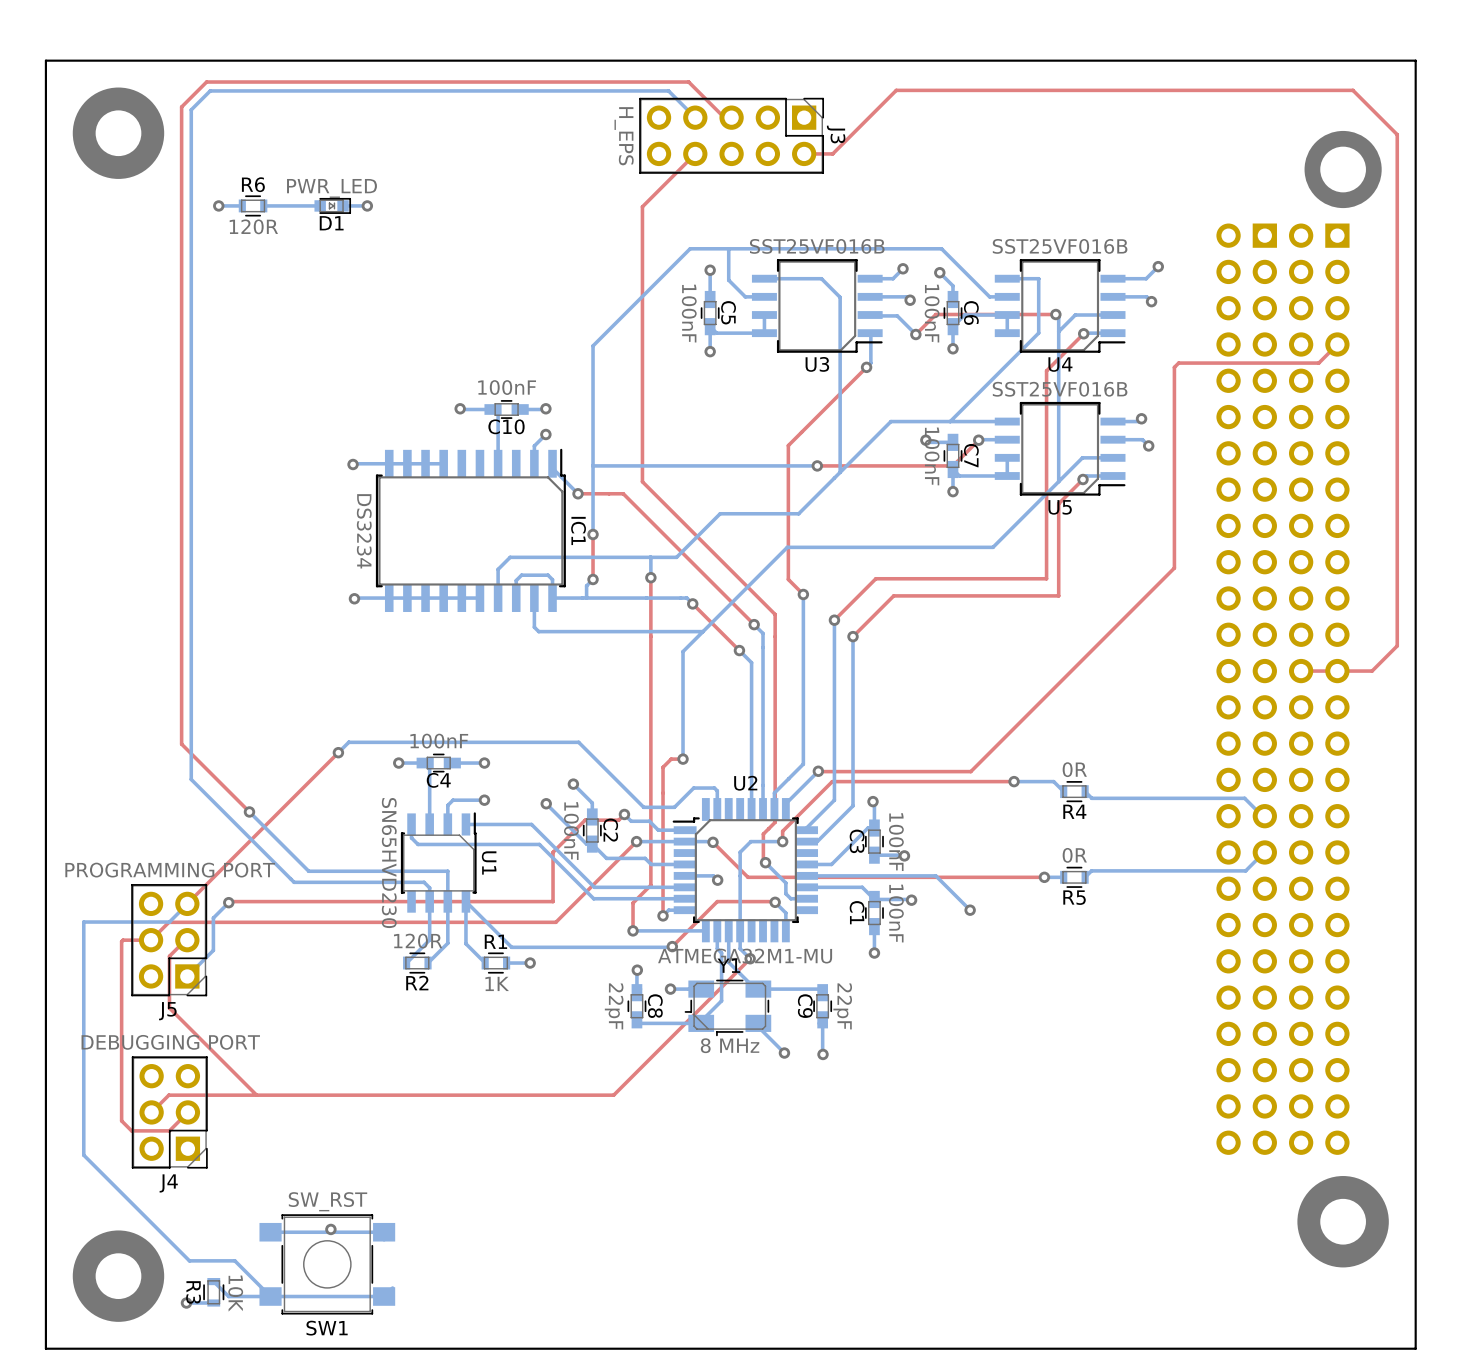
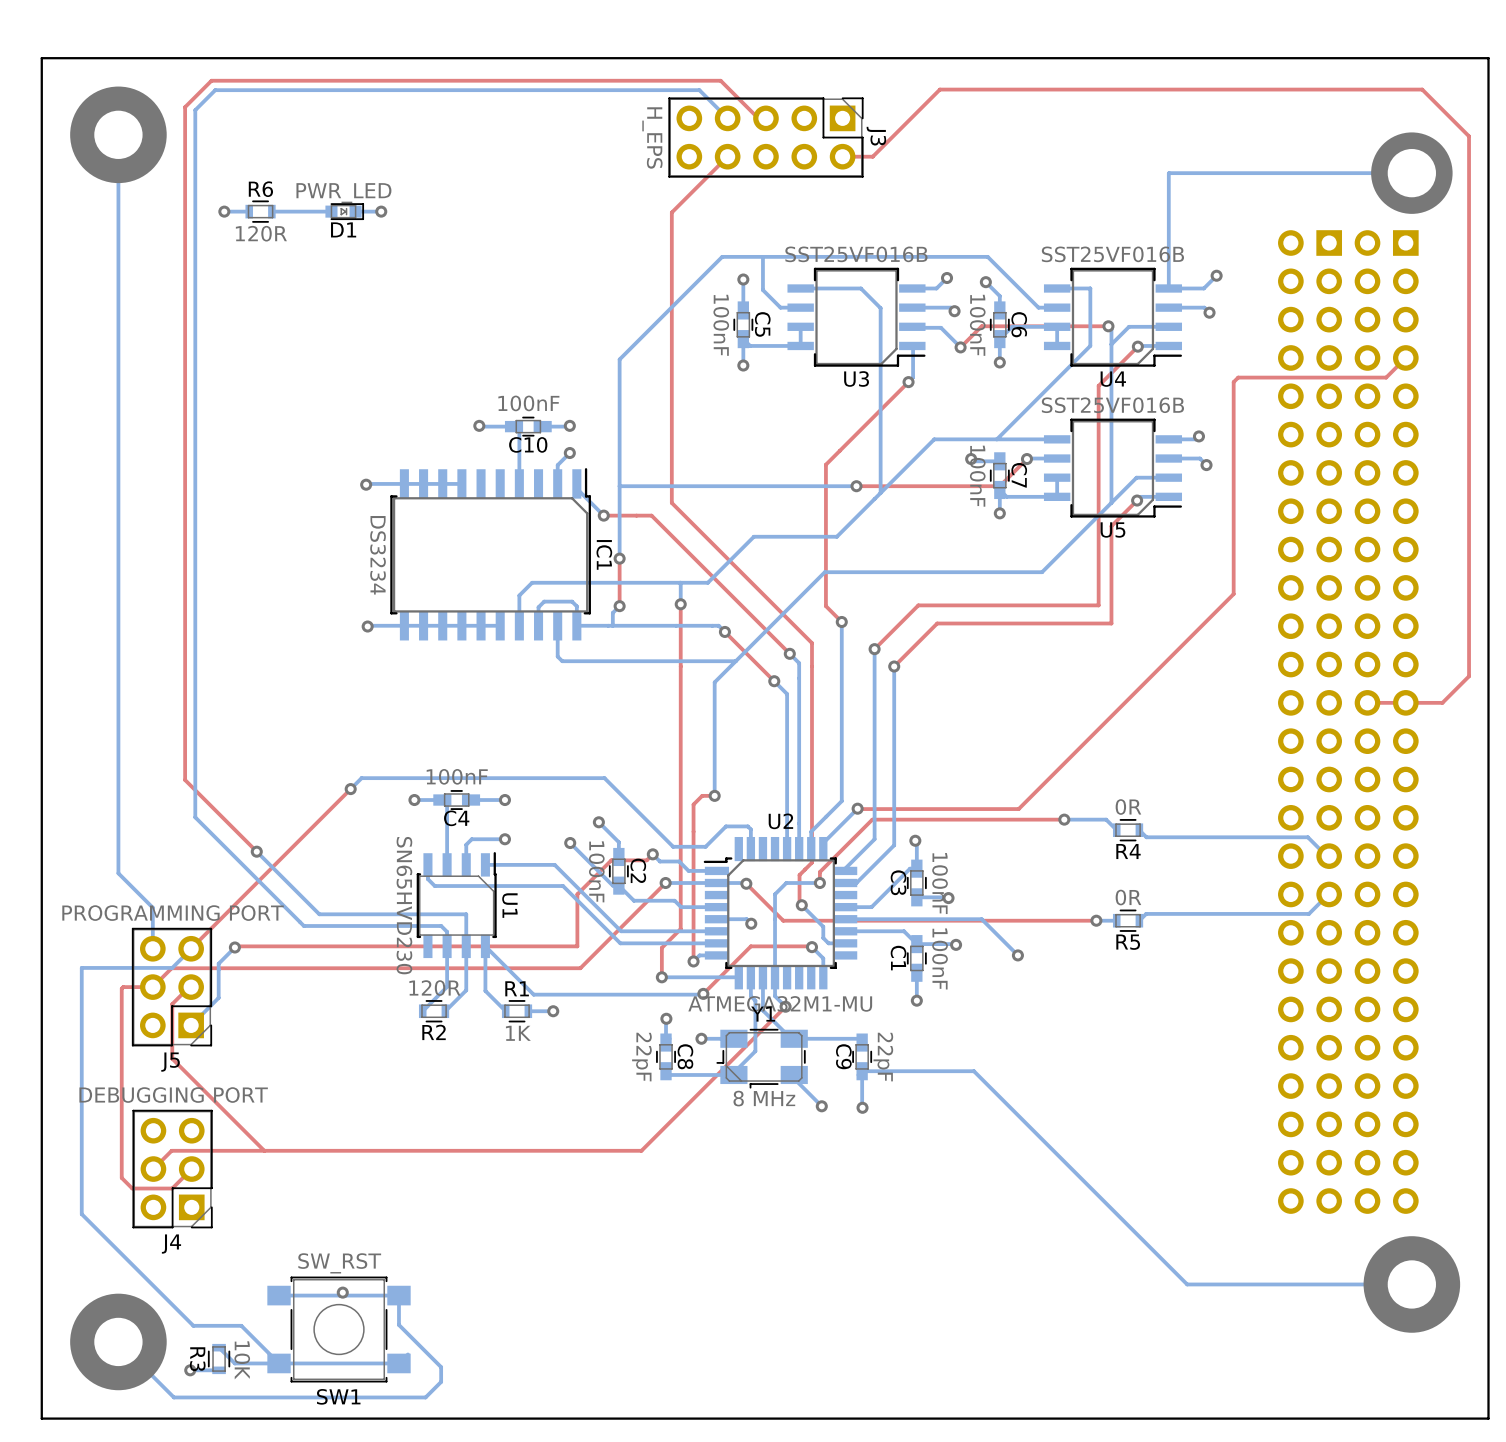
bottom track: none -> (118, 134) (118, 873) (152, 907) (152, 948)
bottom track: none -> (1411, 173) (1169, 173) (1168, 288)
bottom track: none -> (862, 1071) (973, 1071) (1187, 1284) (1411, 1284)
bottom track: none -> (398, 1303) (398, 1324) (441, 1367) (441, 1381) (425, 1397) (173, 1397) (118, 1341)

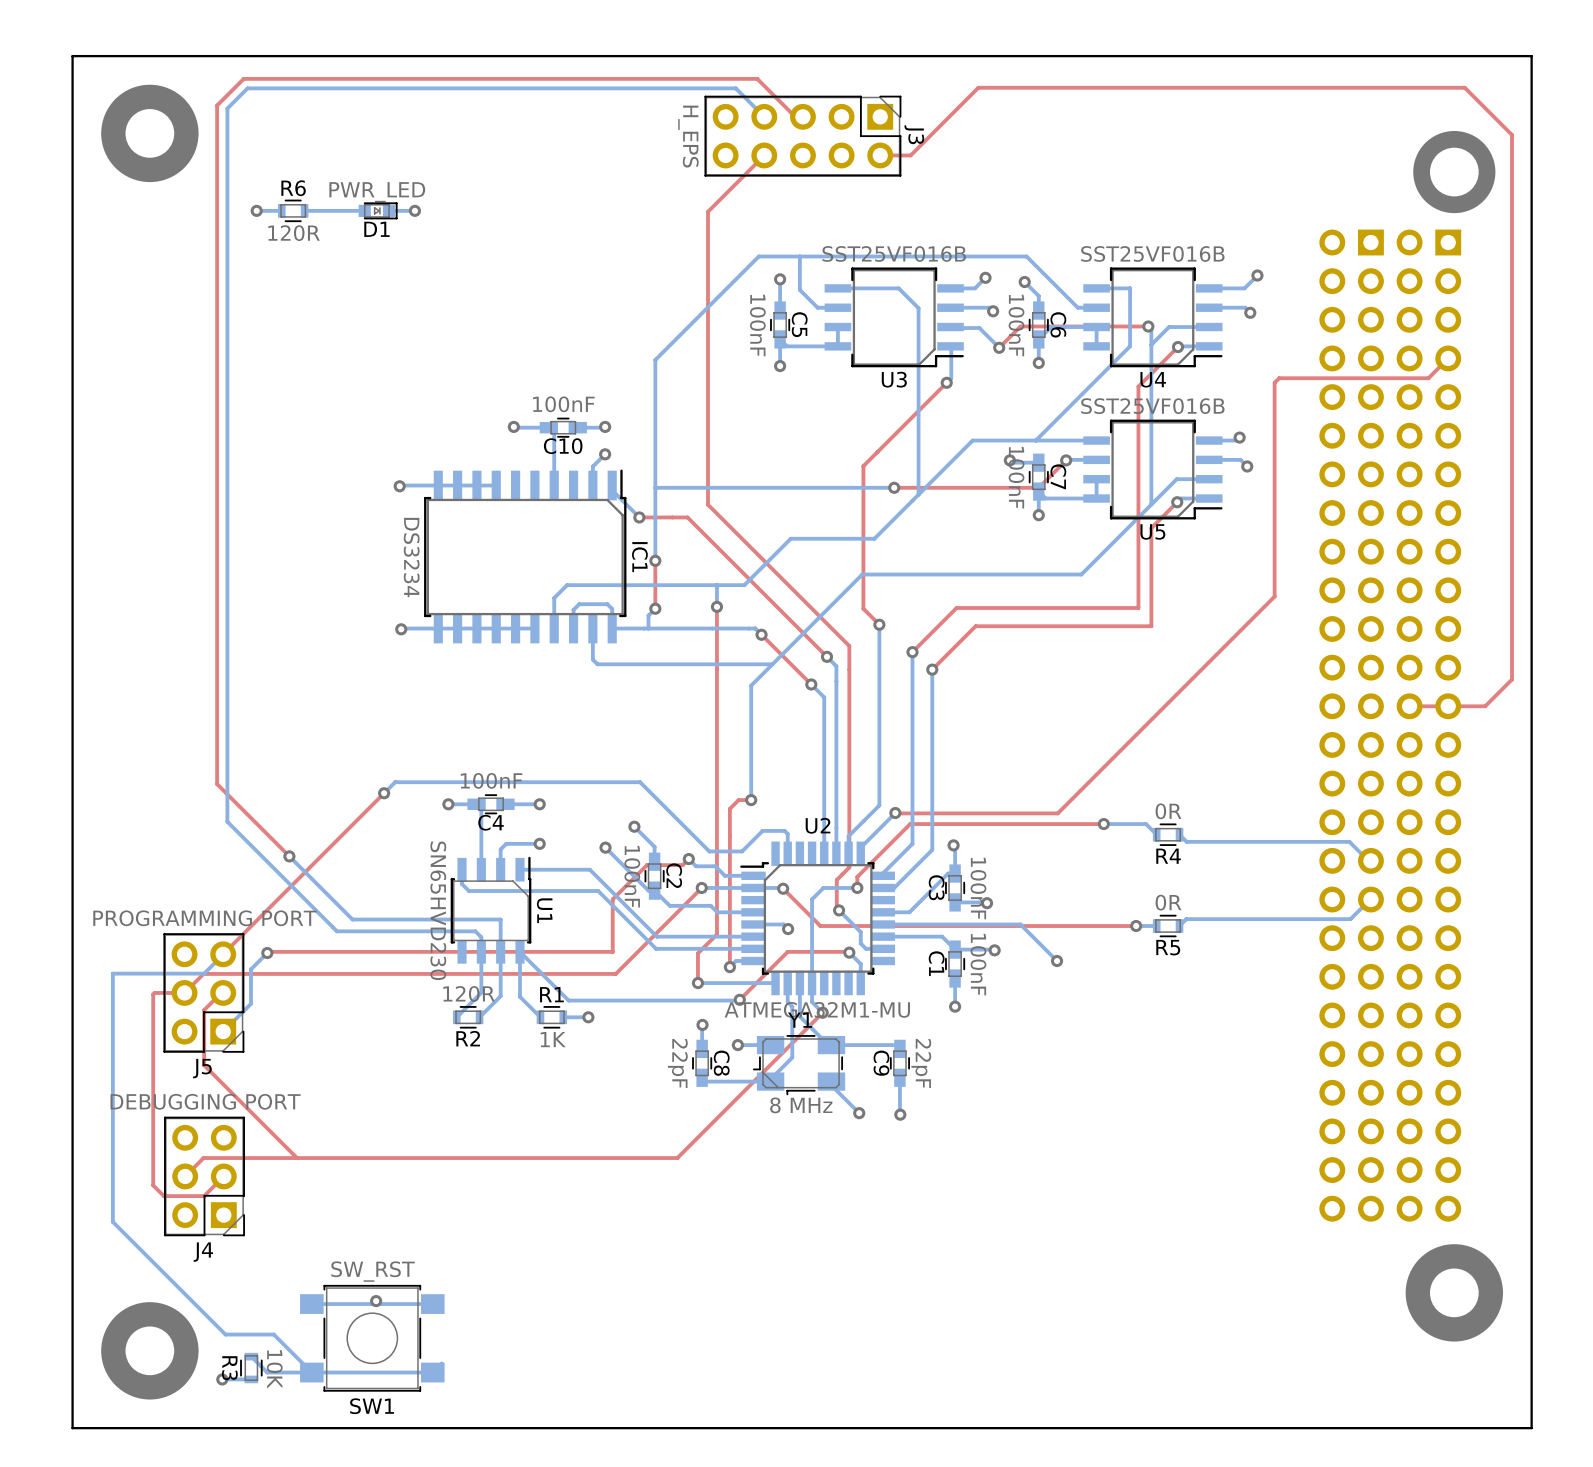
bottom track: (118, 134) (118, 873) (152, 907) (152, 948) -> none
bottom track: (1411, 173) (1169, 173) (1168, 288) -> none
bottom track: (862, 1071) (973, 1071) (1187, 1284) (1411, 1284) -> none
bottom track: (398, 1303) (398, 1324) (441, 1367) (441, 1381) (425, 1397) (173, 1397) (118, 1341) -> none

